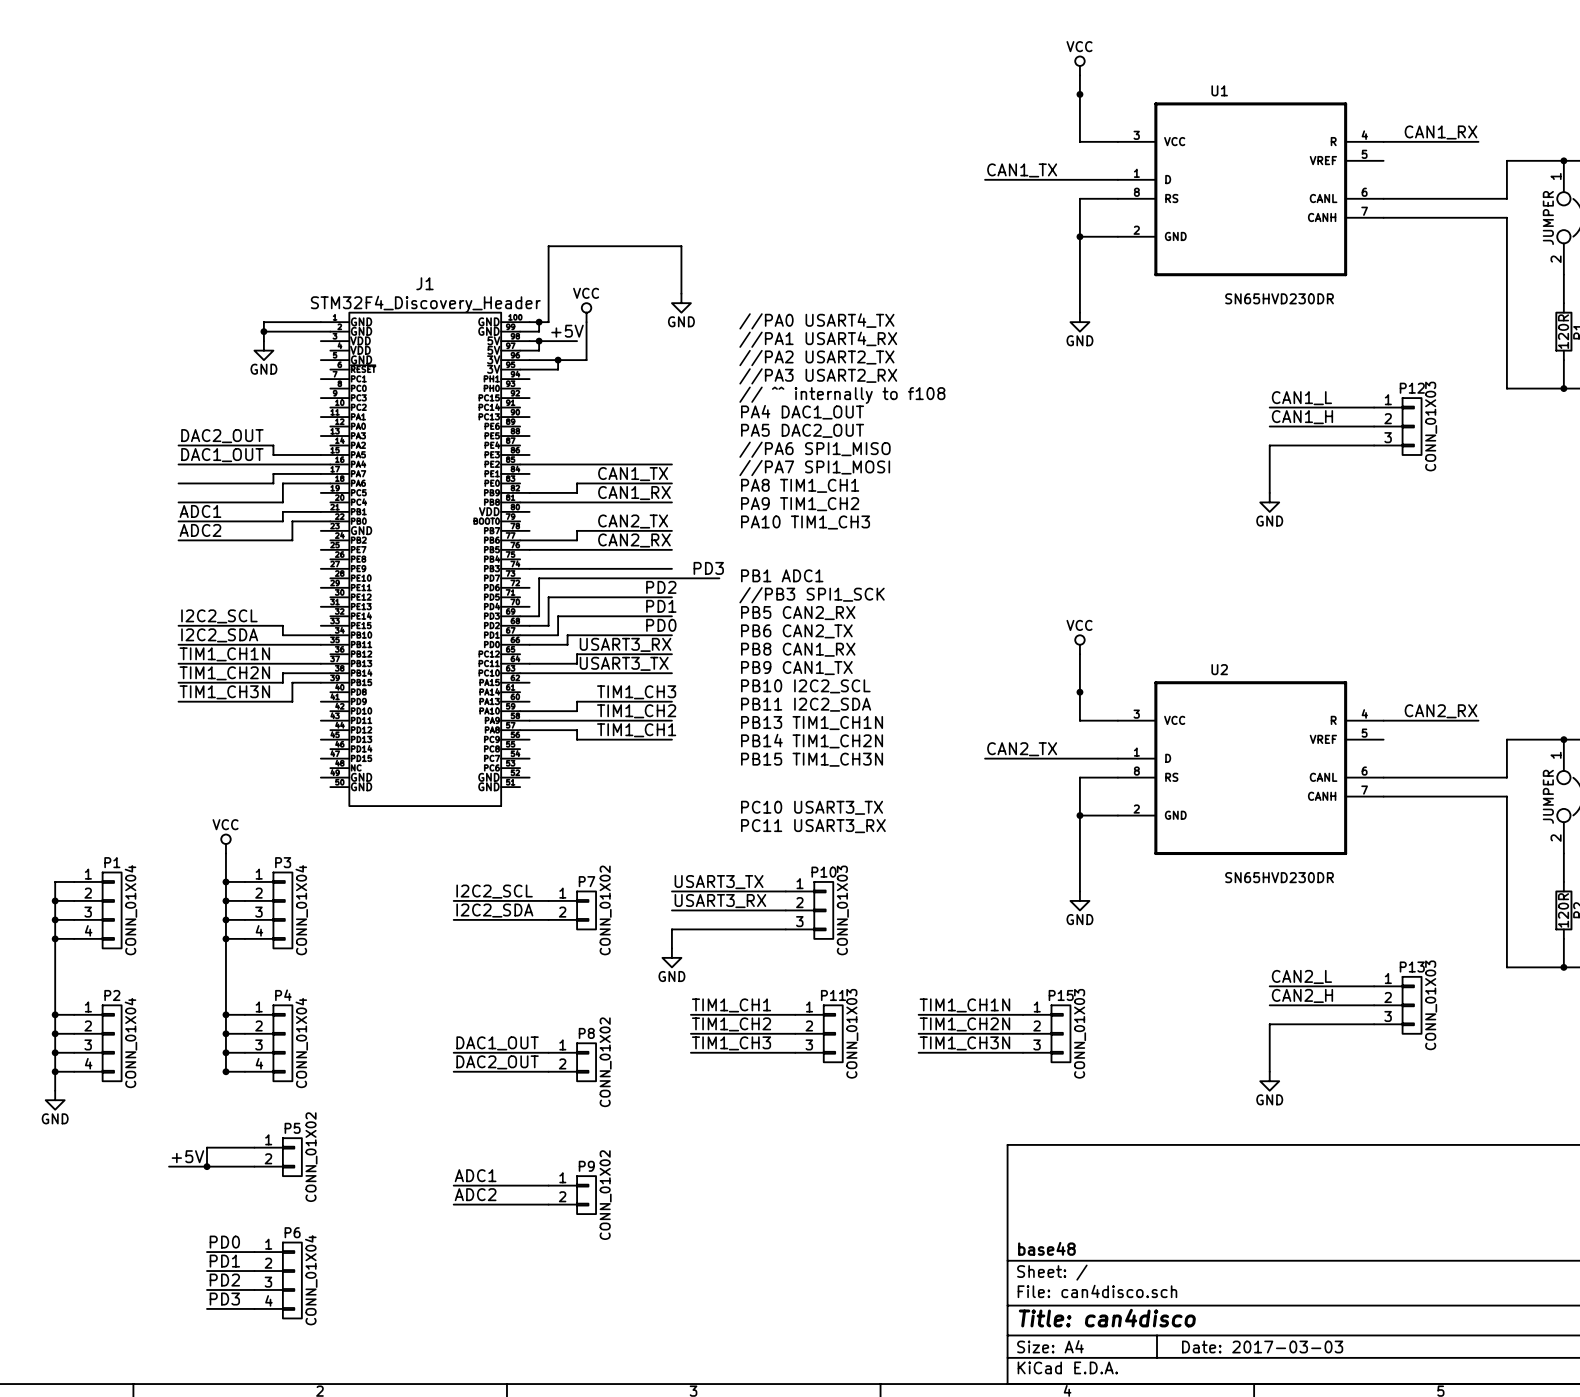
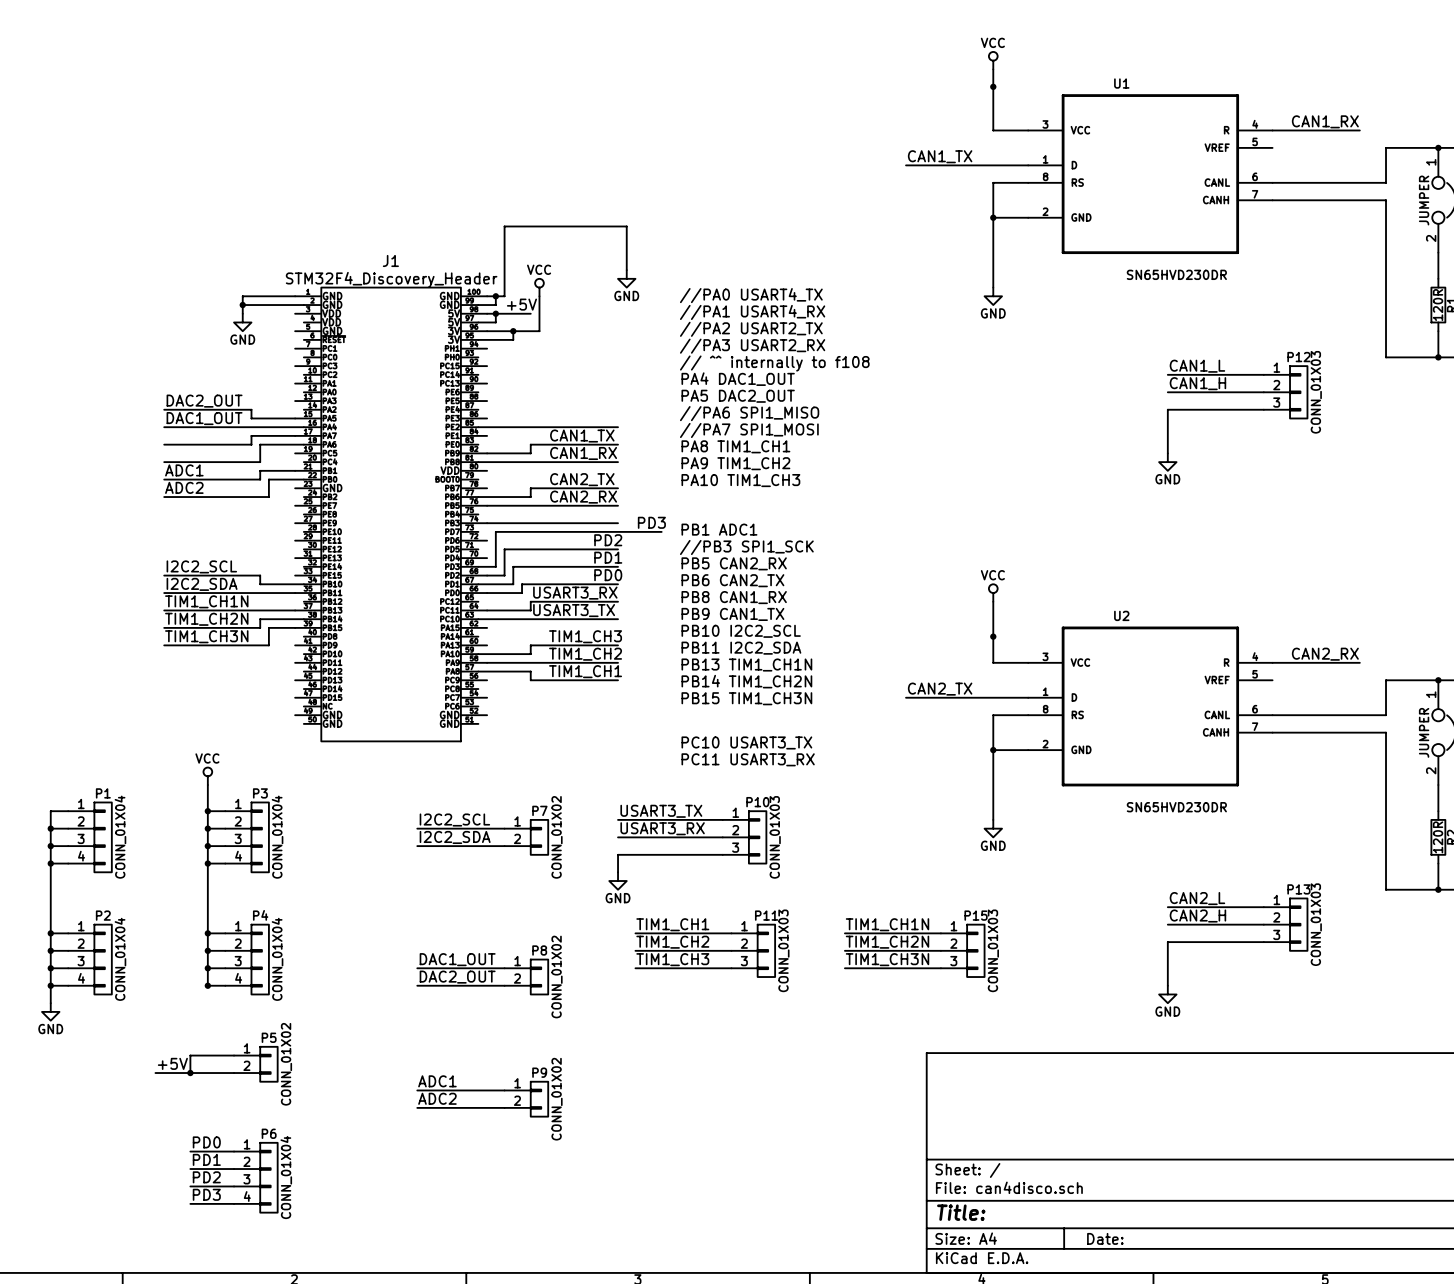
title block: base48 (1046, 1248) -> none
title block: Title: can4disco (1107, 1318) -> Title: (961, 1212)
title block: Date: 2017-03-03 (1262, 1347) -> Date: (1105, 1238)

